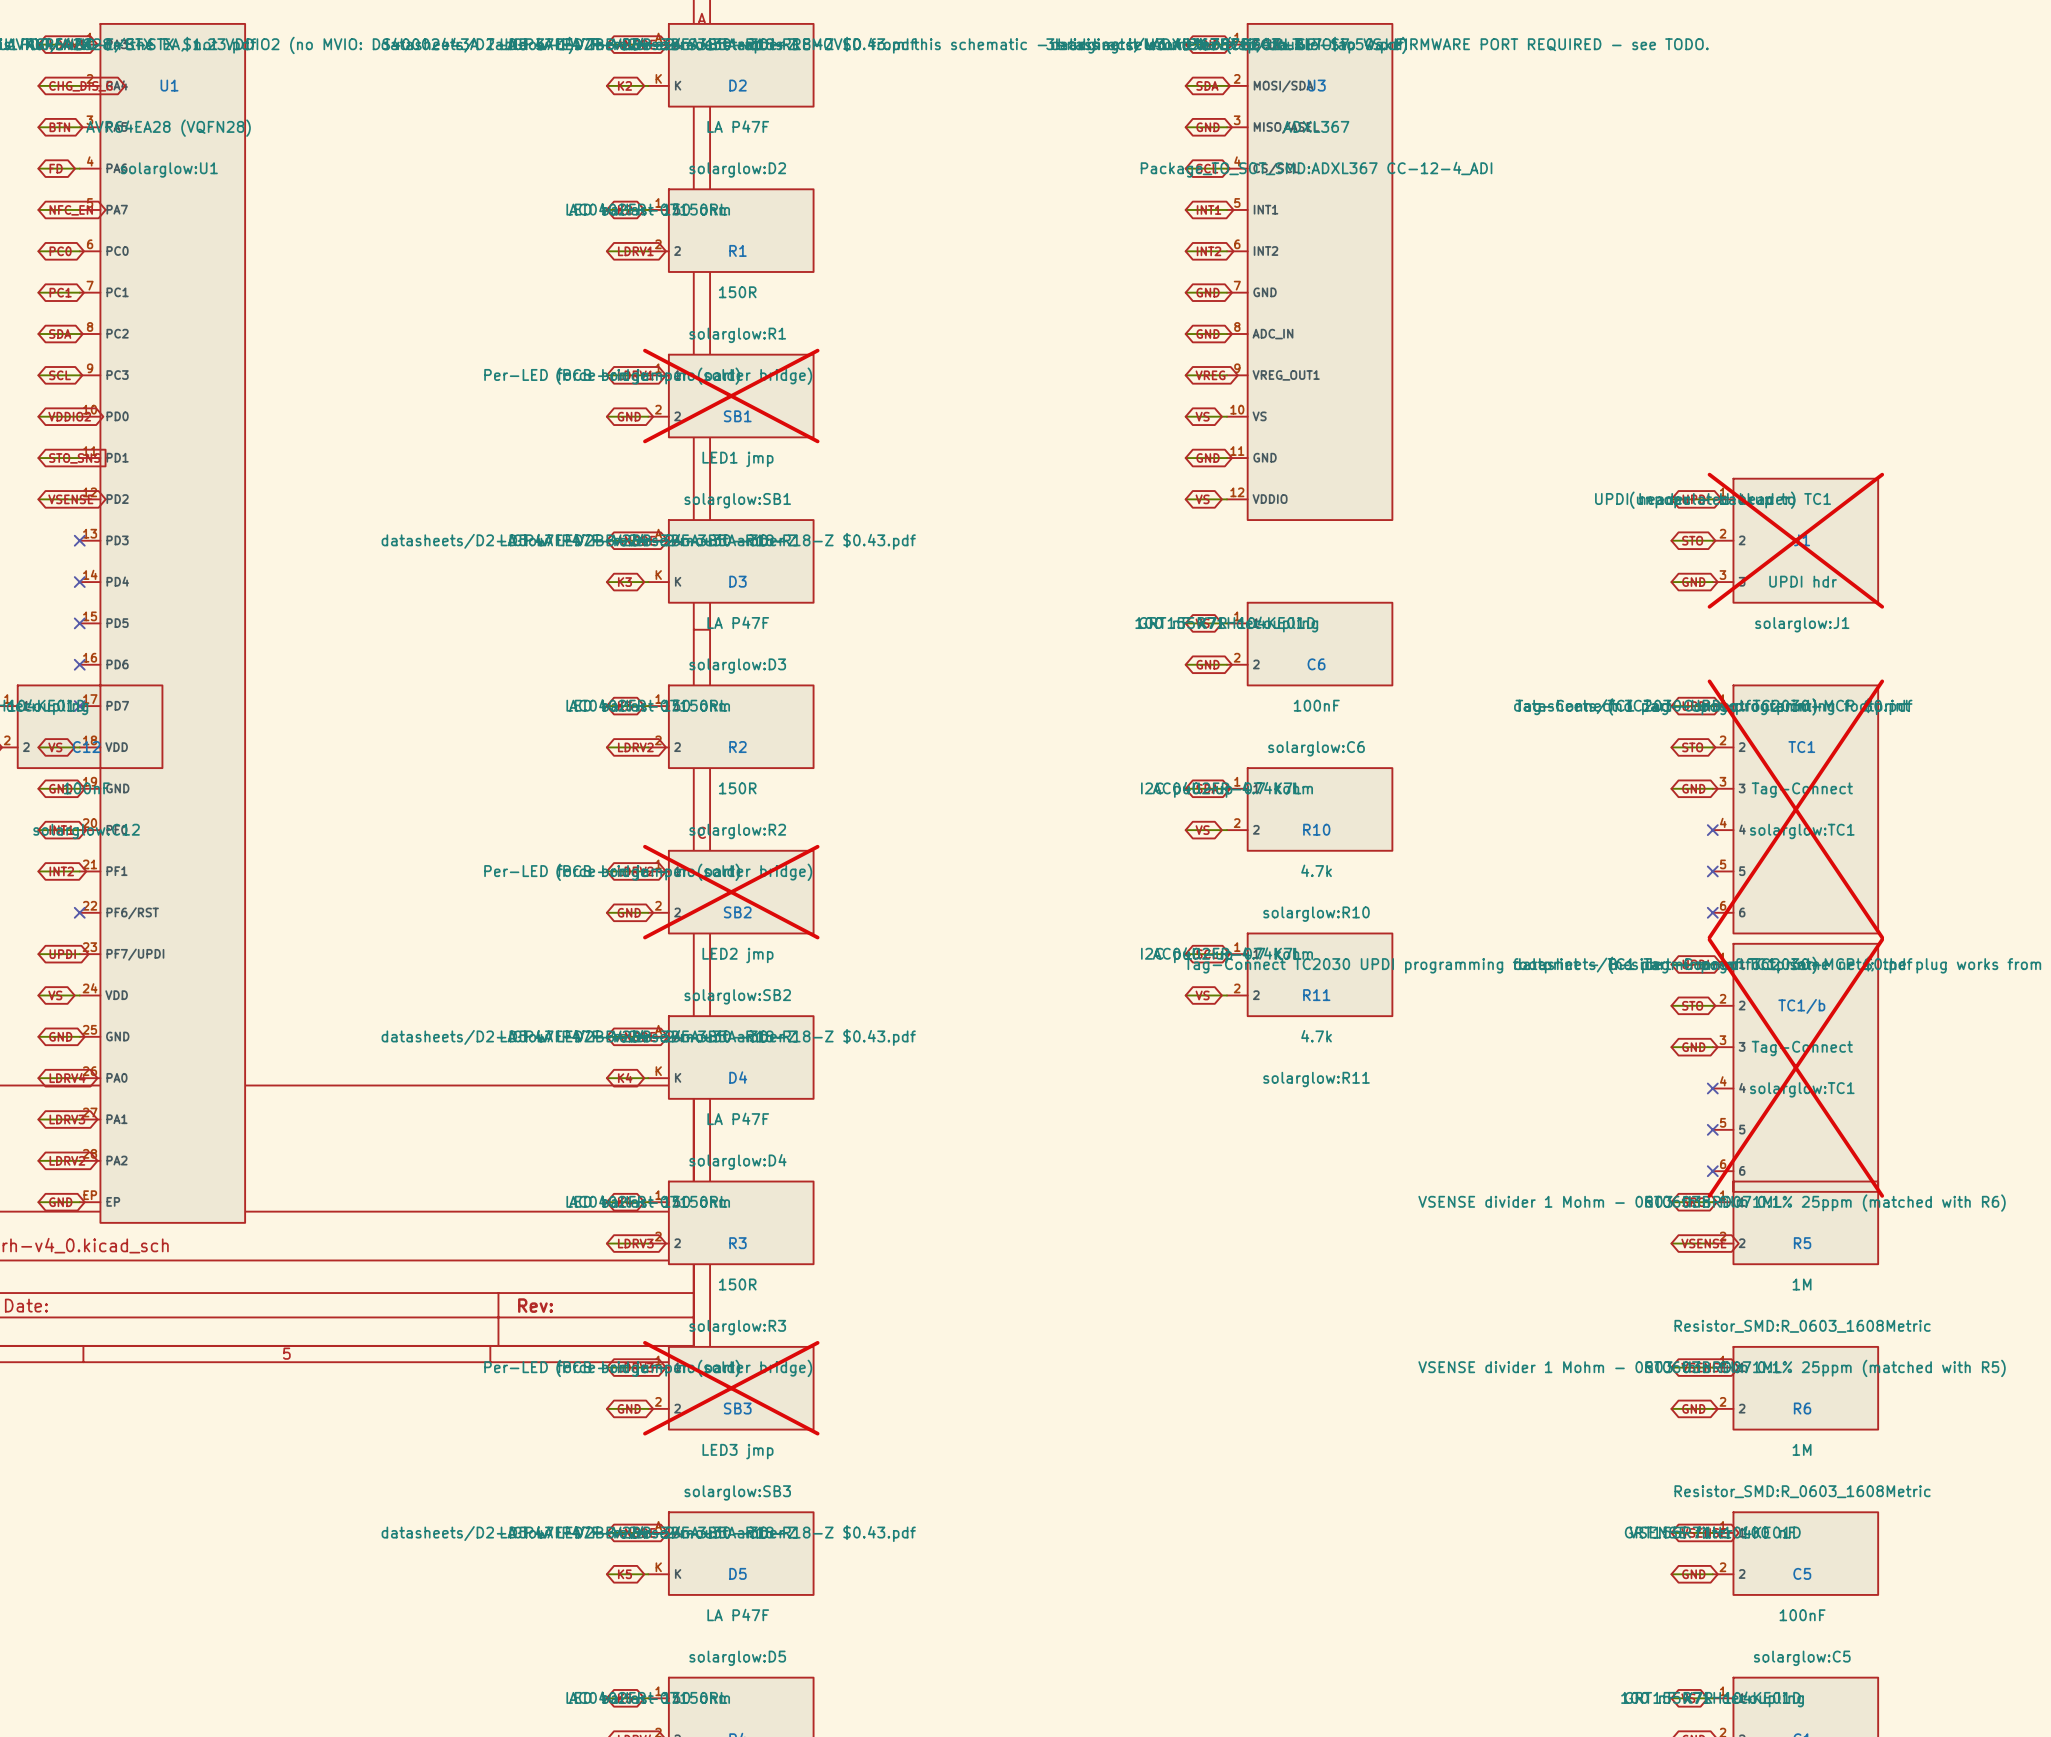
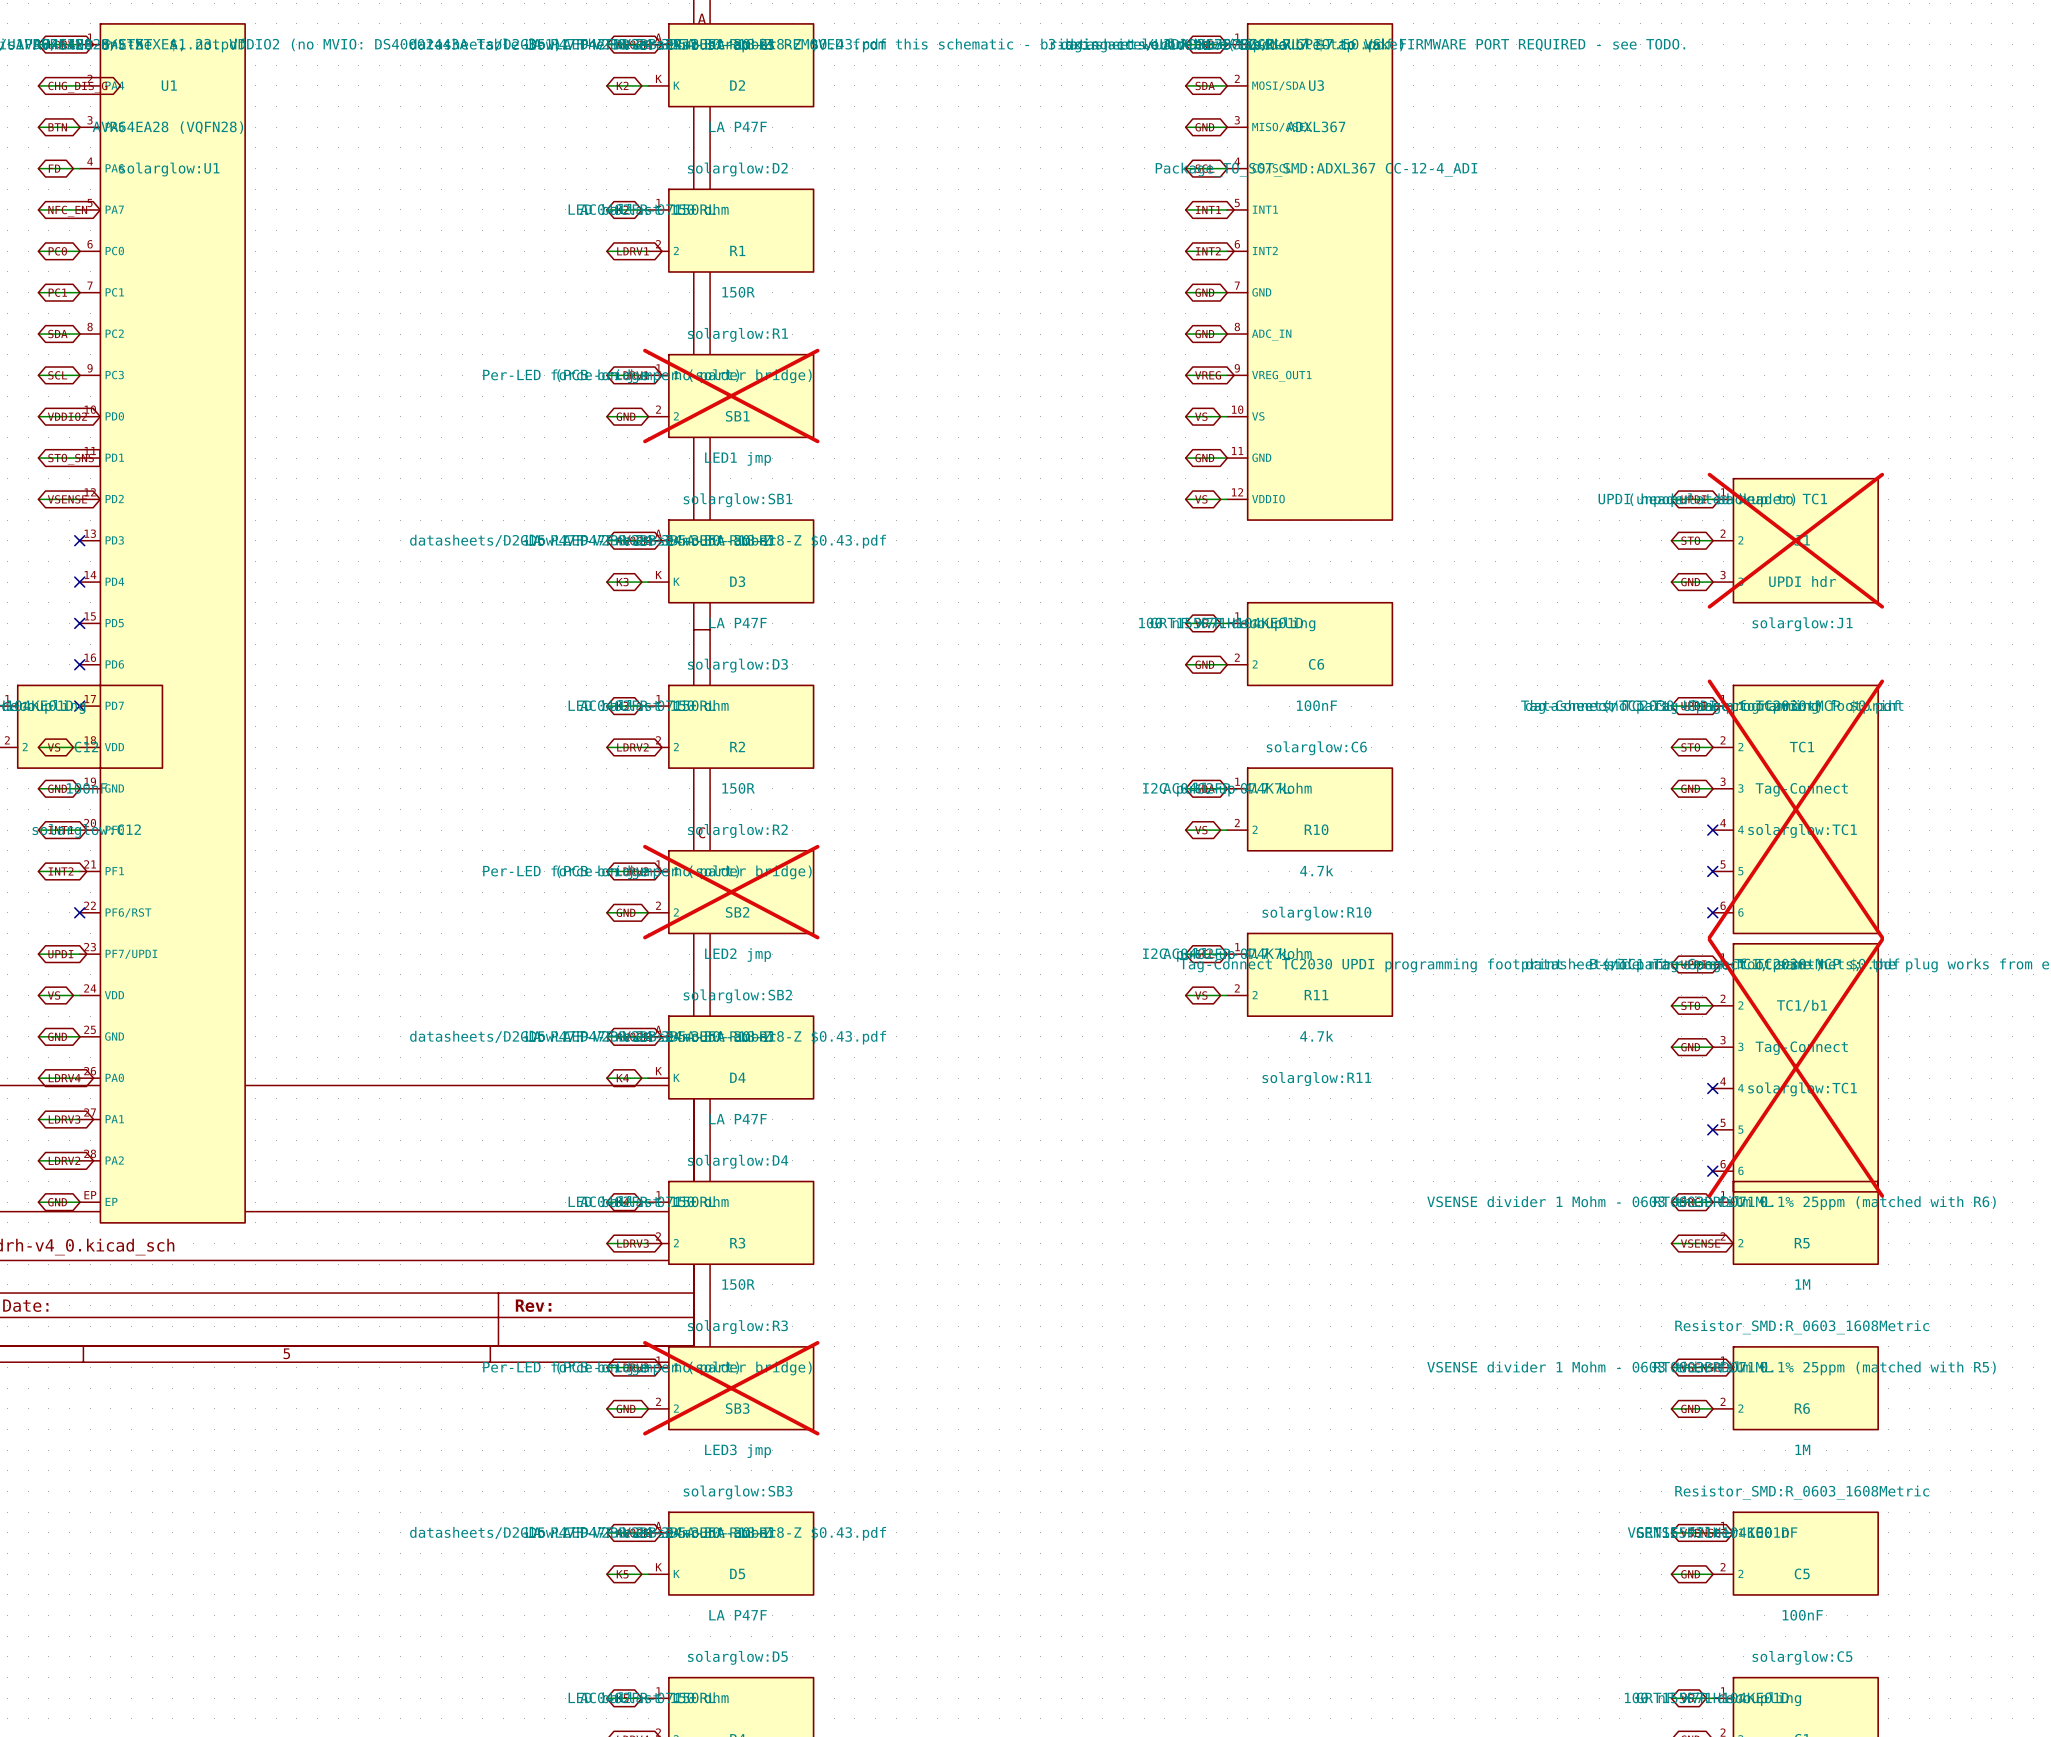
TC1/b name: TC1/b (1801, 1006) -> TC1/b1 (1801, 1005)

